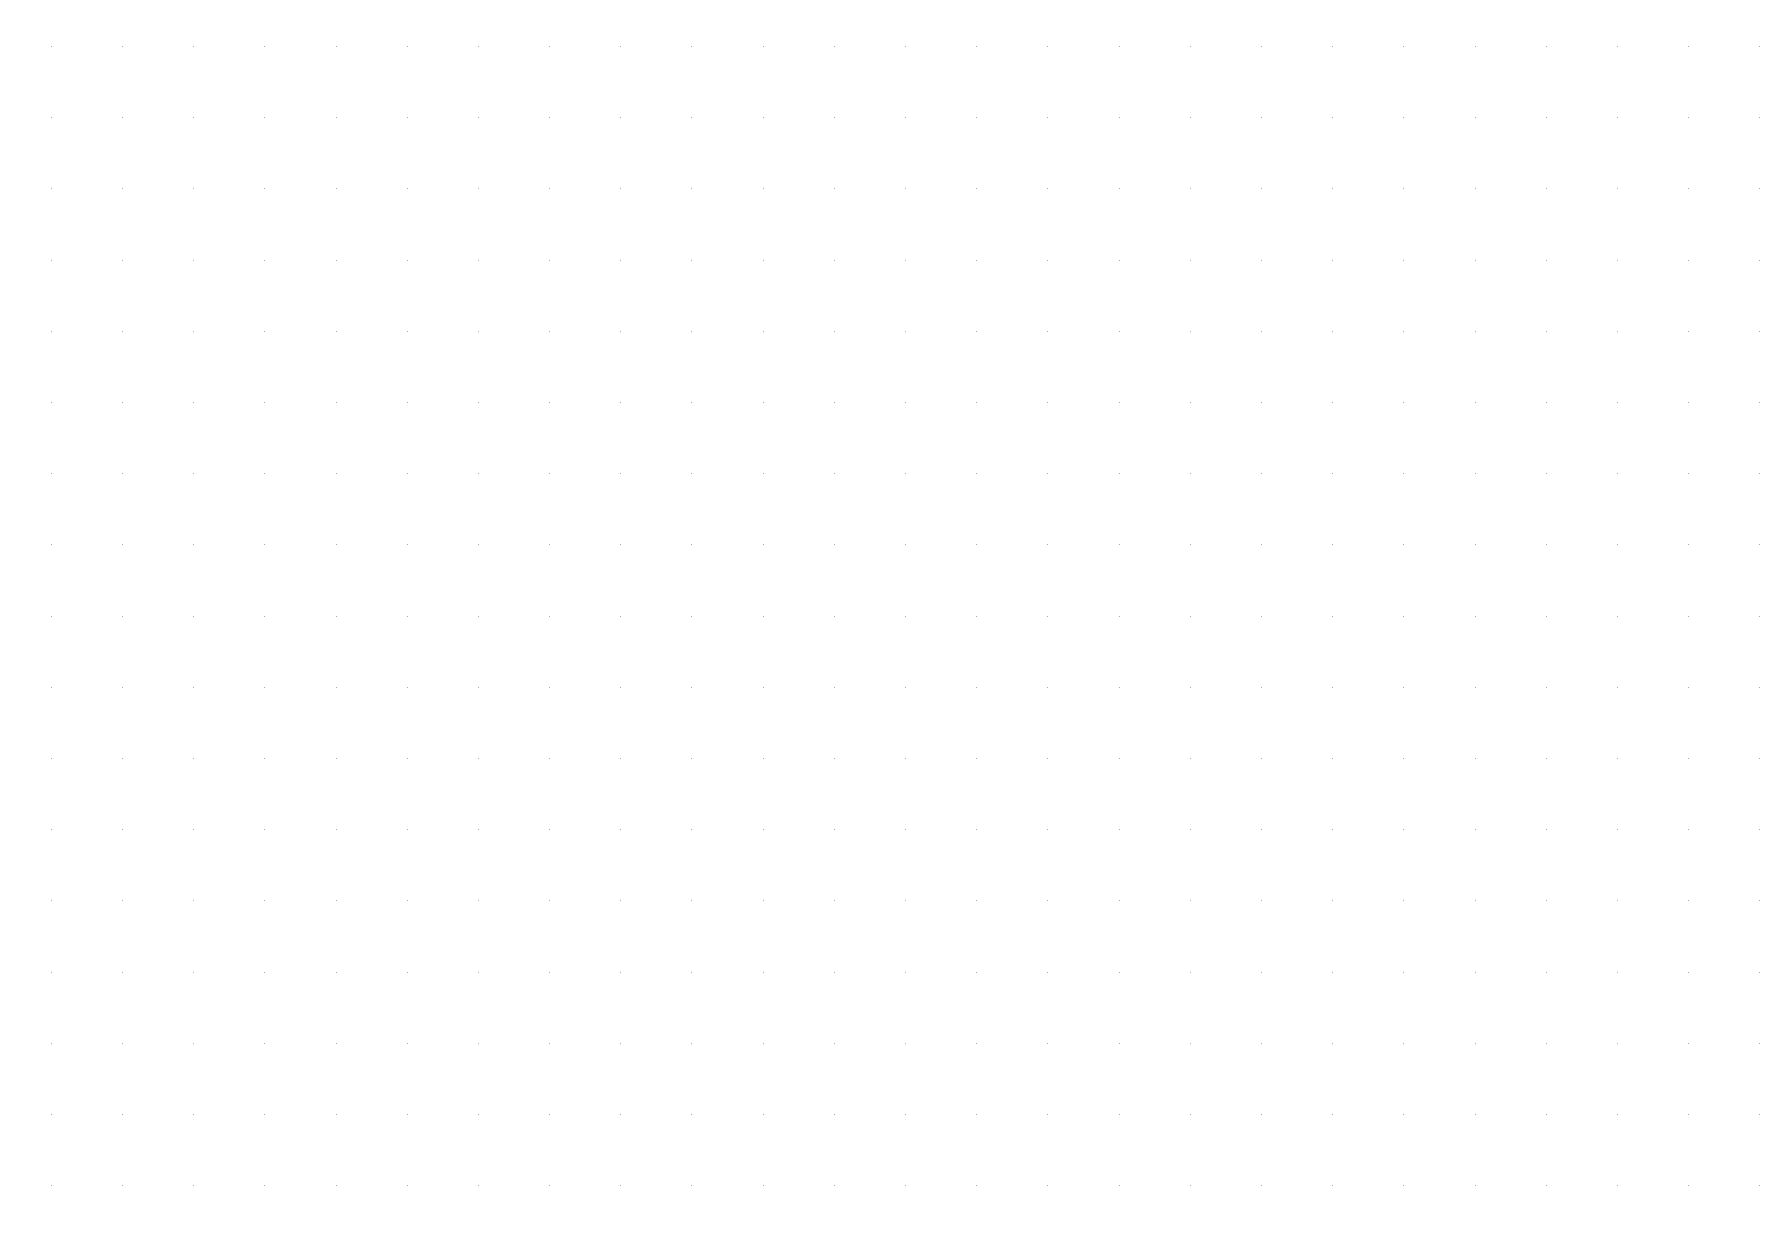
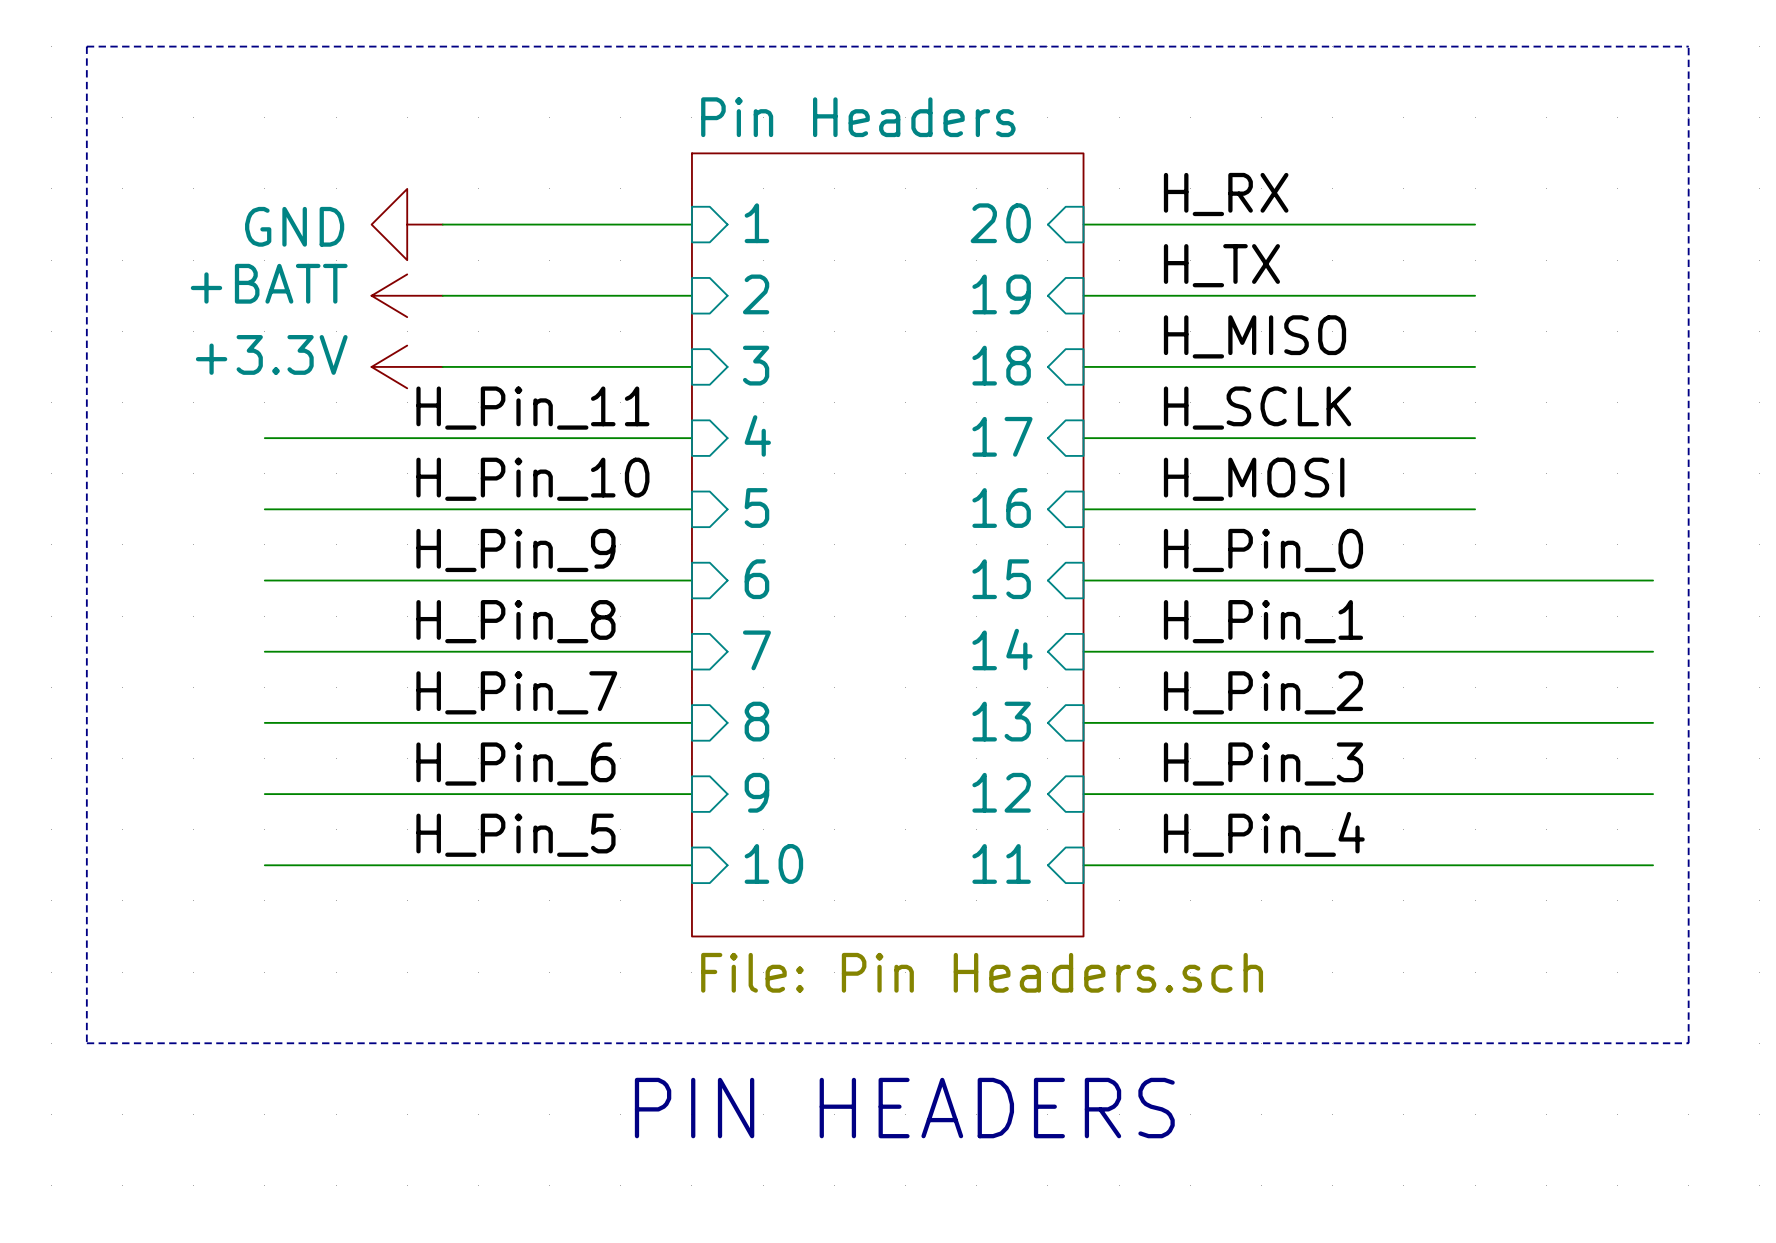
line: none -> (86, 46) (1688, 46) (1688, 1043) (86, 1043) (86, 46)
label: none -> H_RX (1226, 194)
sheet pin: none -> 1 (756, 223)
sheet pin: none -> 20 (1000, 223)
power symbol: none -> GND (407, 224)
wire: none -> (442, 224) (691, 224)
wire: none -> (1083, 224) (1475, 224)
label: none -> H_TX (1221, 265)
sheet pin: none -> 2 (756, 294)
sheet pin: none -> 19 (1001, 294)
power symbol: none -> +BATT (407, 295)
wire: none -> (442, 295) (691, 295)
wire: none -> (1083, 295) (1475, 295)
label: none -> H_MISO (1254, 336)
sheet pin: none -> 3 (756, 365)
sheet pin: none -> 18 (1001, 365)
power symbol: none -> +3.3V (407, 366)
wire: none -> (442, 366) (691, 366)
wire: none -> (1083, 366) (1475, 366)
label: none -> H_Pin_11 (532, 408)
label: none -> H_SCLK (1257, 408)
sheet pin: none -> 4 (757, 435)
sheet pin: none -> 17 (1002, 436)
wire: none -> (264, 438) (691, 438)
wire: none -> (1083, 438) (1475, 438)
label: none -> H_Pin_10 (532, 479)
label: none -> H_MOSI (1254, 479)
sheet pin: none -> 5 (756, 508)
sheet pin: none -> 16 (1001, 508)
wire: none -> (264, 509) (691, 509)
wire: none -> (1083, 509) (1475, 509)
sheet Pin Headers: none -> File: Pin Headers.sch (887, 544)
label: none -> H_Pin_9 (515, 550)
label: none -> H_Pin_0 (1263, 550)
sheet pin: none -> 6 (756, 579)
sheet pin: none -> 15 (1001, 579)
wire: none -> (264, 580) (691, 580)
wire: none -> (1083, 580) (1653, 580)
label: none -> H_Pin_8 (515, 621)
label: none -> H_Pin_1 (1263, 621)
sheet pin: none -> 14 (1002, 649)
sheet pin: none -> 7 (756, 650)
wire: none -> (264, 651) (691, 651)
wire: none -> (1083, 651) (1653, 651)
label: none -> H_Pin_7 (516, 692)
label: none -> H_Pin_2 (1263, 692)
sheet pin: none -> 8 (756, 721)
sheet pin: none -> 13 (1001, 721)
wire: none -> (264, 722) (691, 722)
wire: none -> (1083, 722) (1653, 722)
label: none -> H_Pin_6 (515, 764)
label: none -> H_Pin_3 (1263, 764)
sheet pin: none -> 9 (756, 792)
sheet pin: none -> 12 (1001, 792)
wire: none -> (264, 794) (691, 794)
wire: none -> (1083, 794) (1653, 794)
label: none -> H_Pin_4 (1264, 834)
label: none -> H_Pin_5 (515, 835)
sheet pin: none -> 10 (773, 863)
sheet pin: none -> 11 (1001, 863)
wire: none -> (264, 865) (691, 865)
wire: none -> (1083, 865) (1653, 865)
text: none -> PIN HEADERS (904, 1108)

